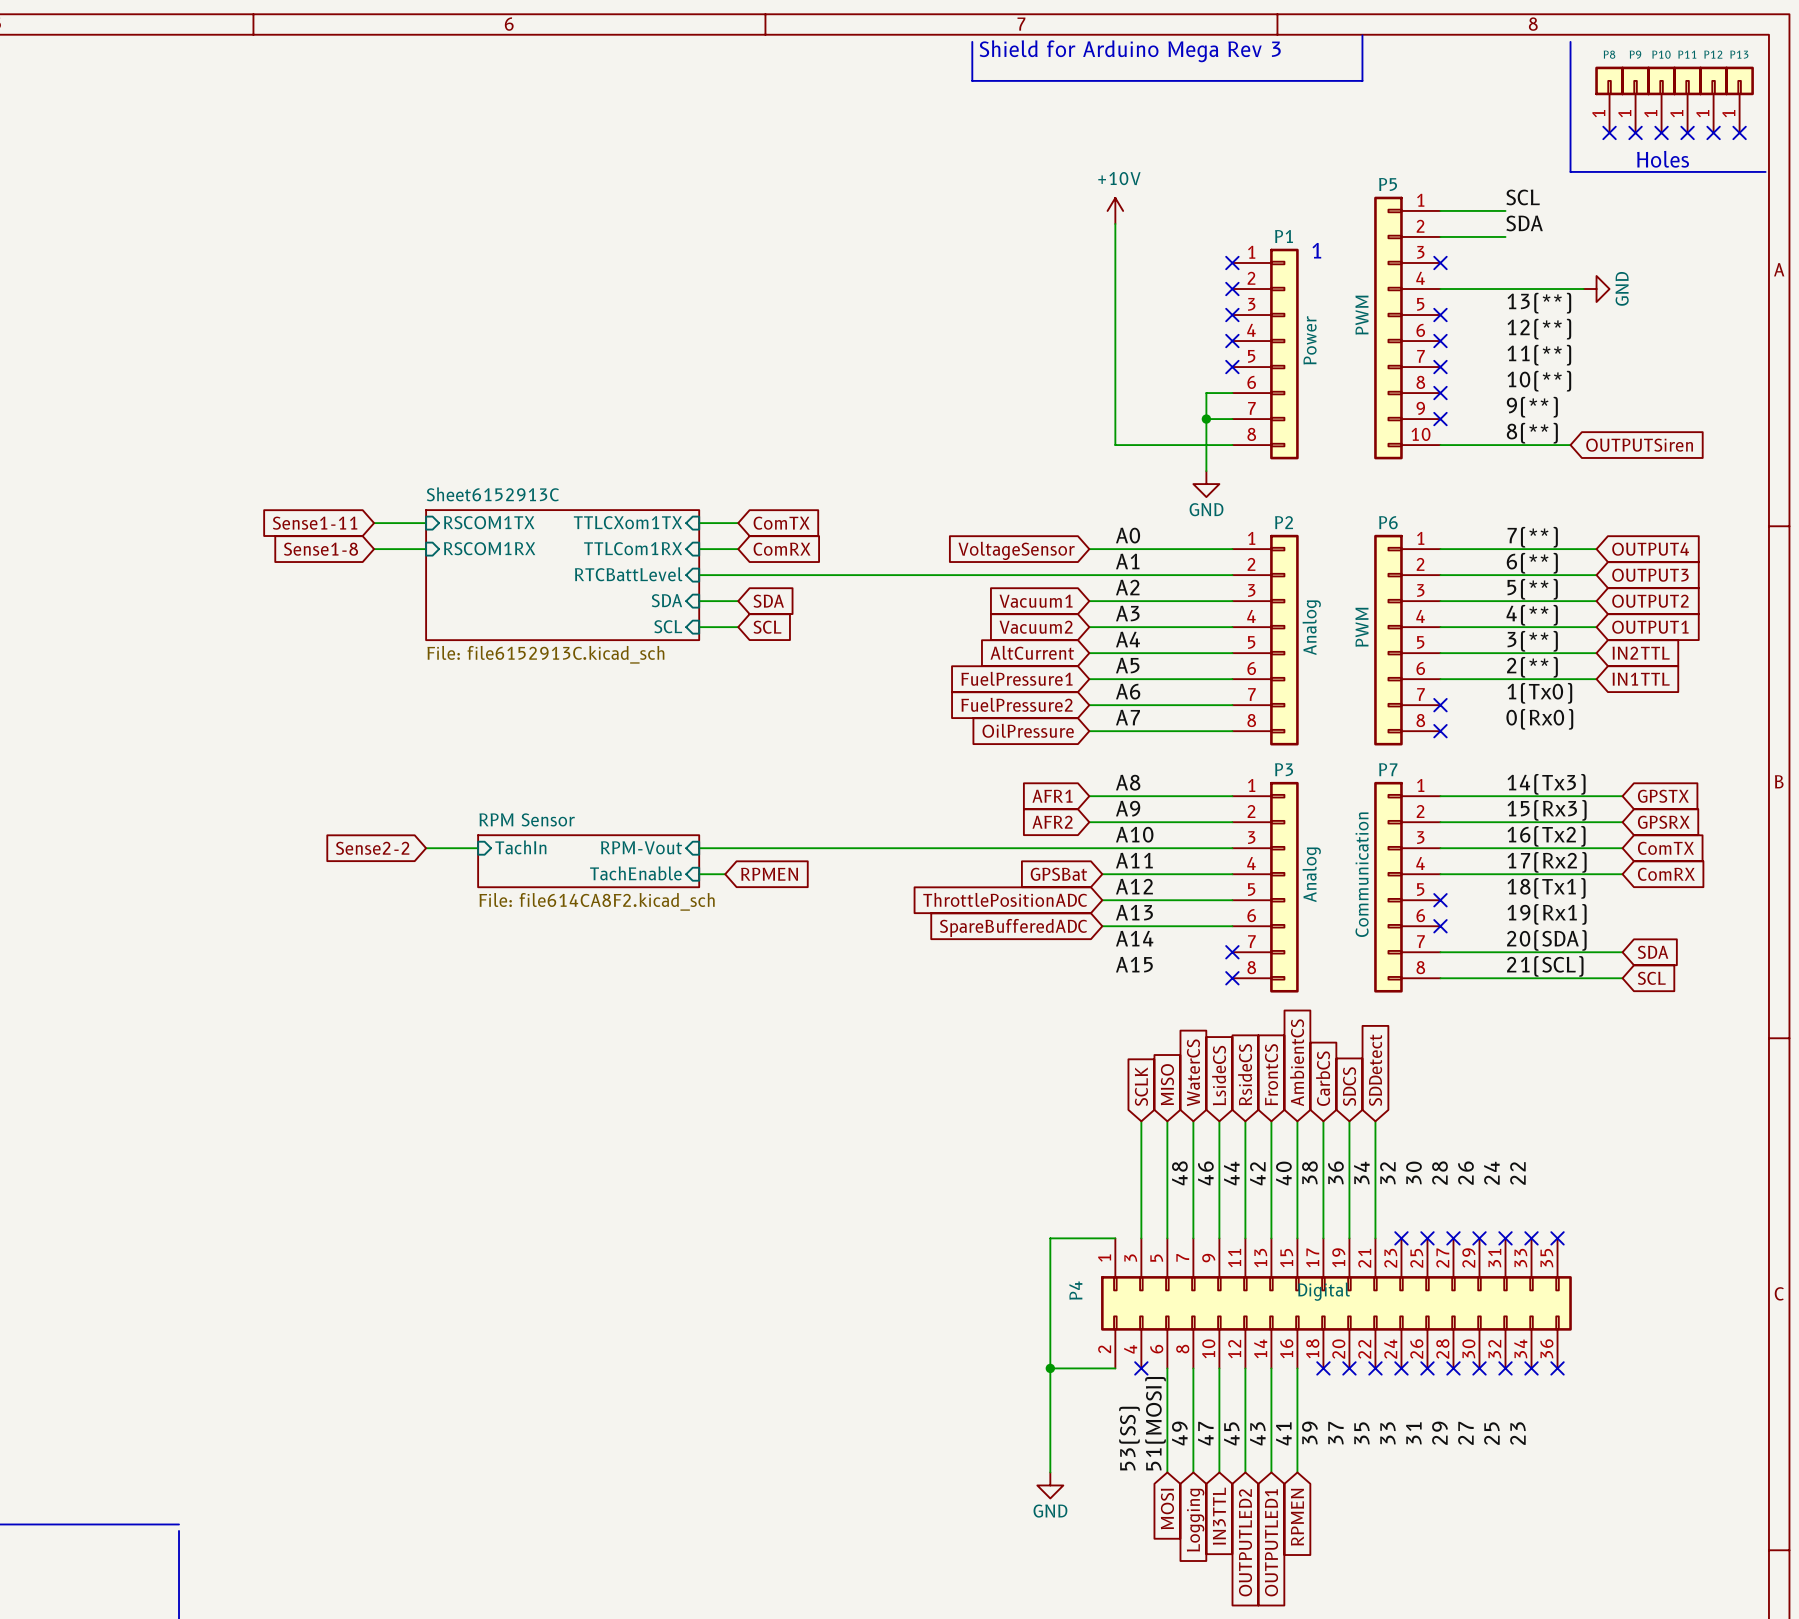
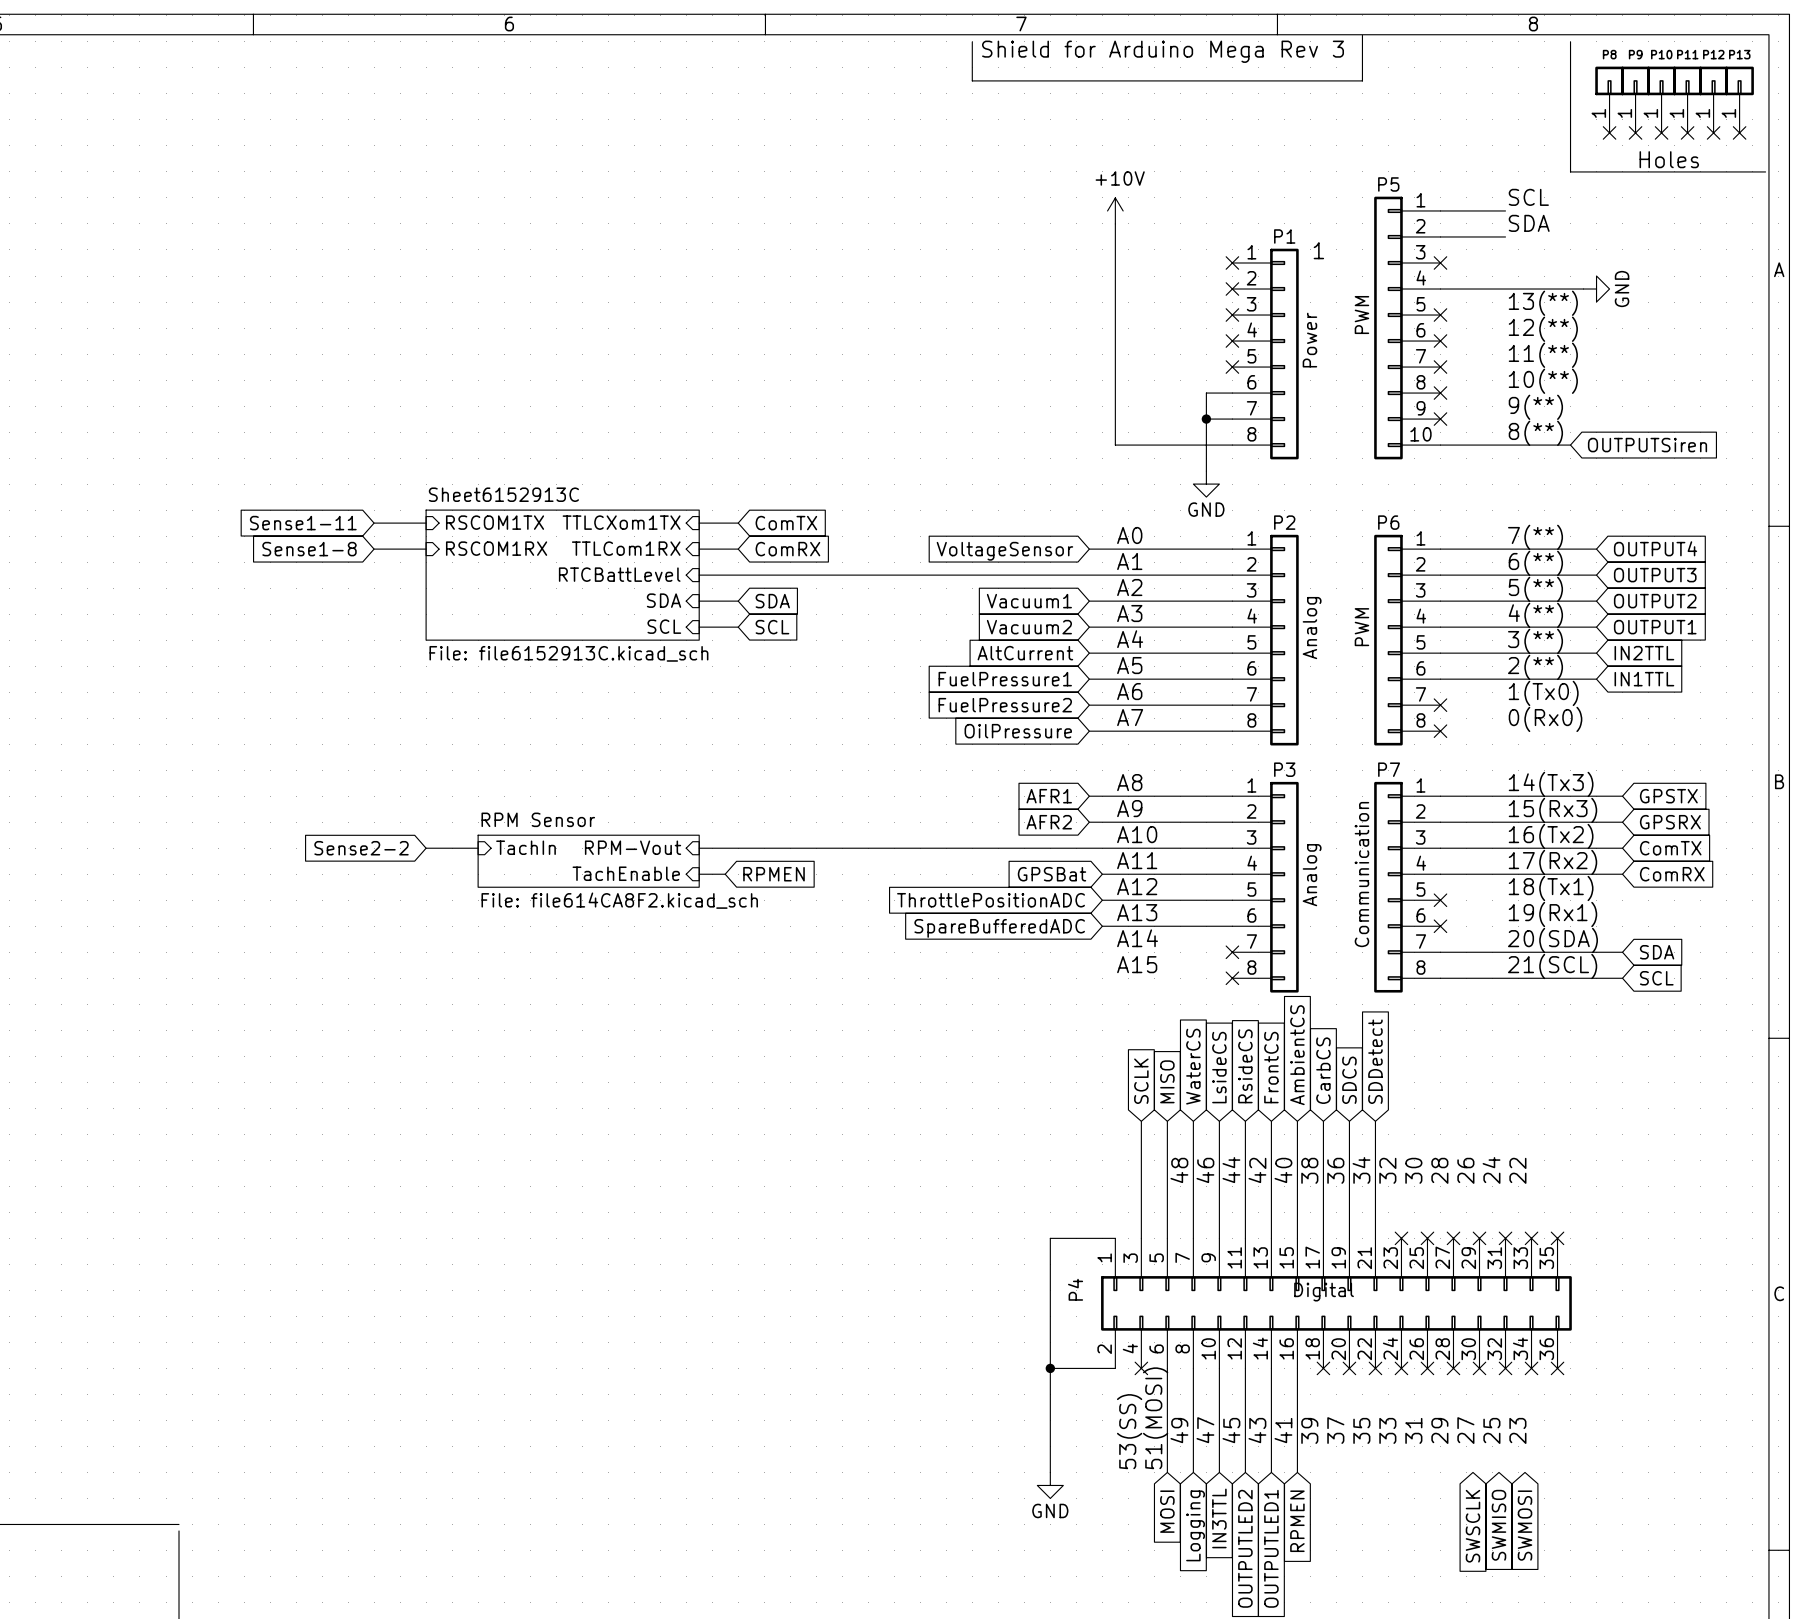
global label: none -> SWSCLK (1472, 1526)
global label: none -> SWMISO (1499, 1525)
global label: none -> SWMOSI (1525, 1525)

